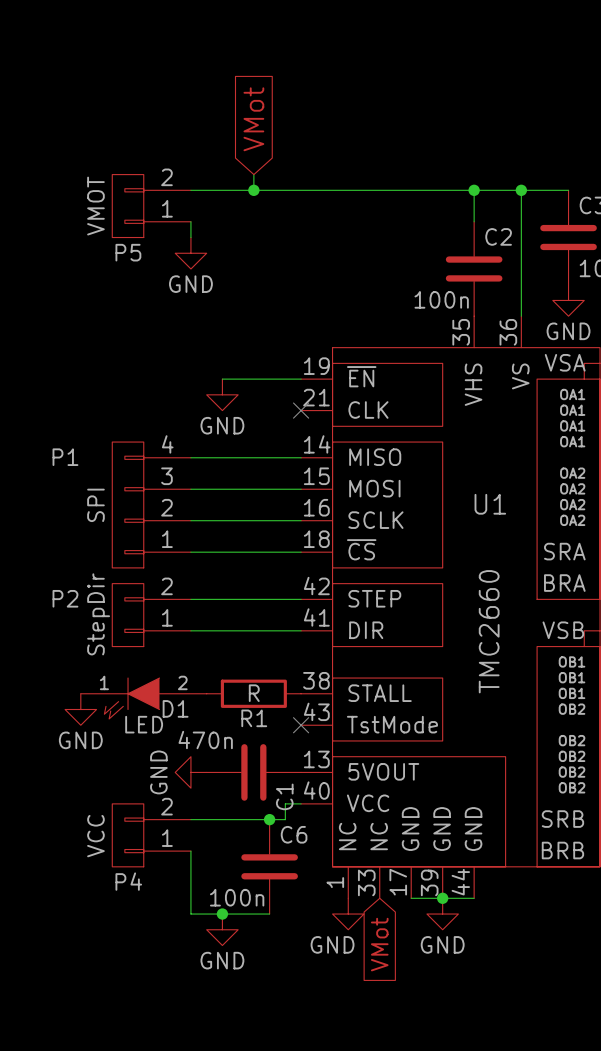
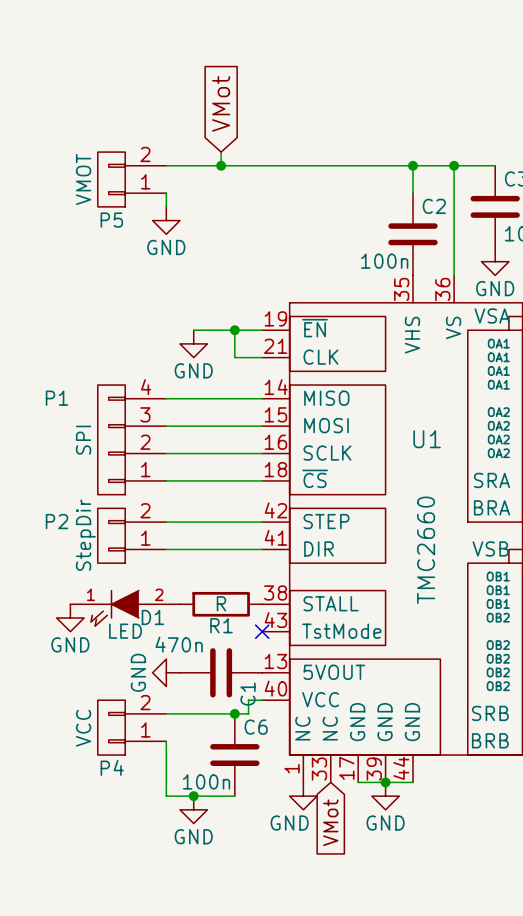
wire: none -> (234, 330) (234, 357) (262, 357)
junction: none -> (234, 330)
no-connect mark: (301, 410) -> none

